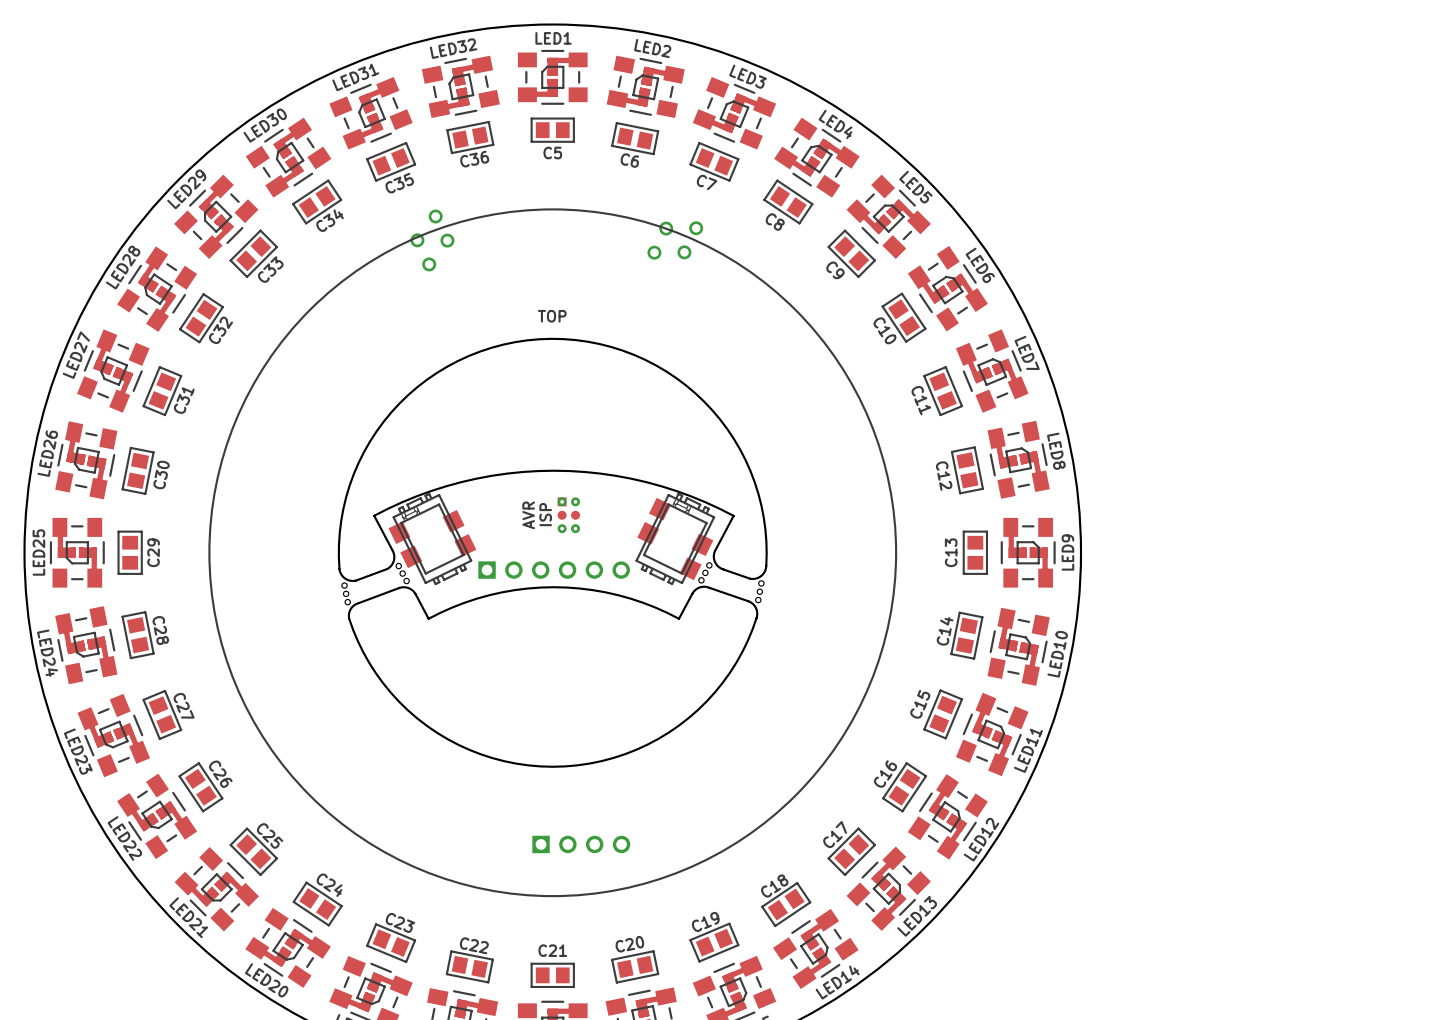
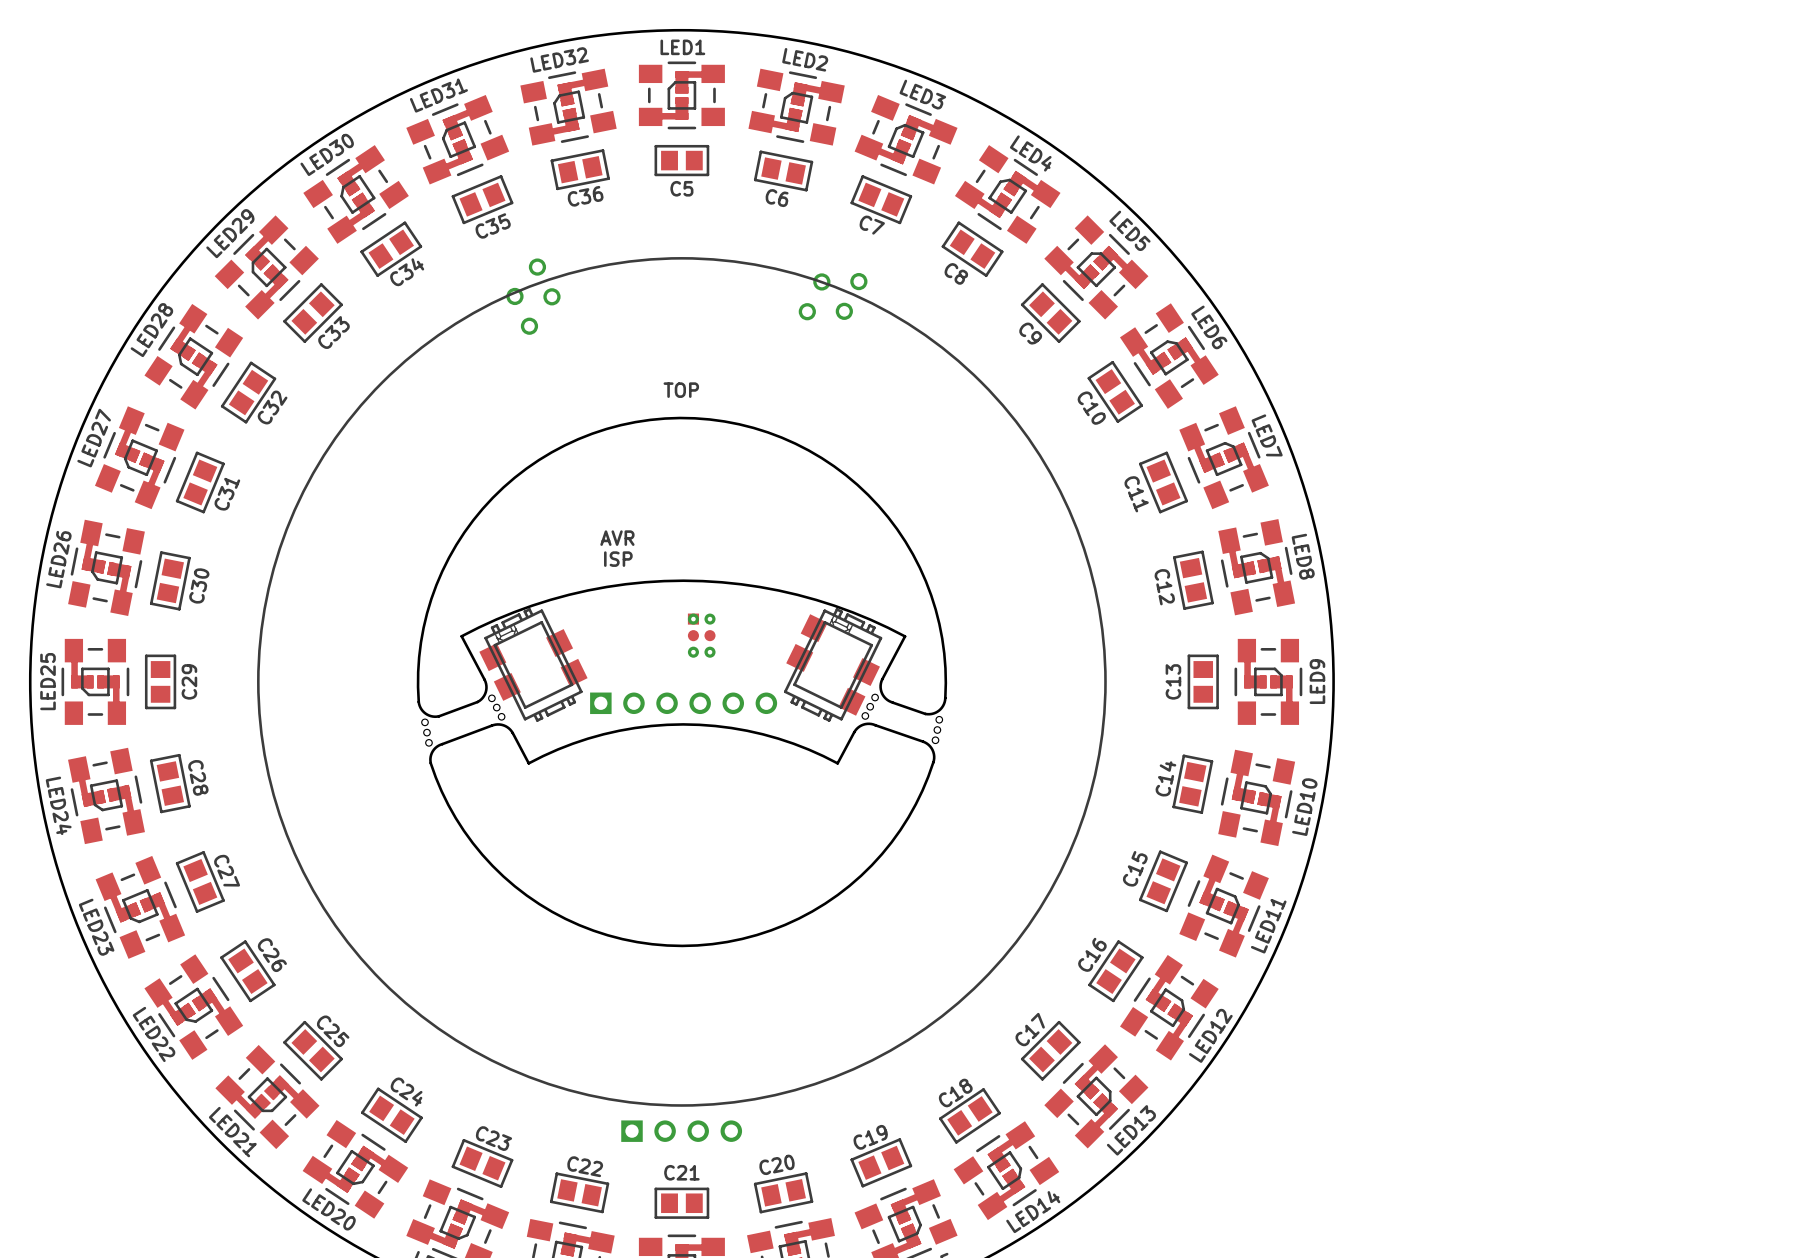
text rotation: 0° (545, 514) -> 90° clockwise (618, 559)
text position: ISP (545, 514) -> ISP (618, 559)
text rotation: 0° (528, 515) -> 90° clockwise (617, 538)
text position: AVR (528, 515) -> AVR (617, 538)
part position: (581, 844) -> (681, 1131)

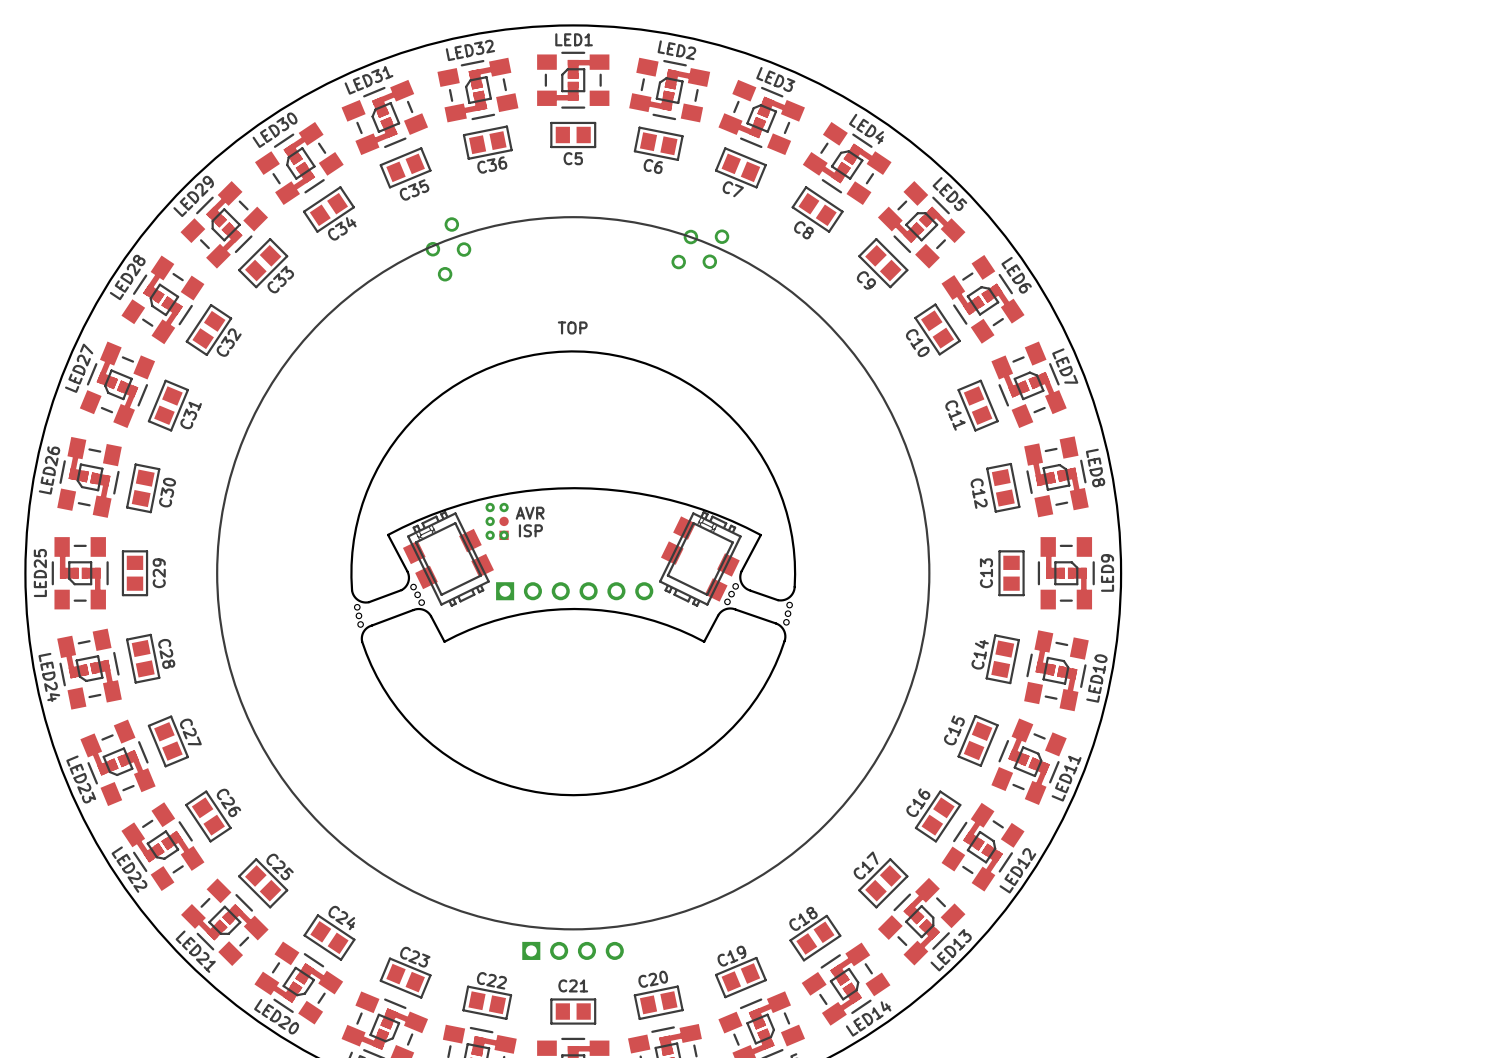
text position: AVR (617, 538) -> AVR (530, 513)
text position: ISP (618, 559) -> ISP (530, 530)
part: none -> (497, 521)
part: (701, 635) -> none

